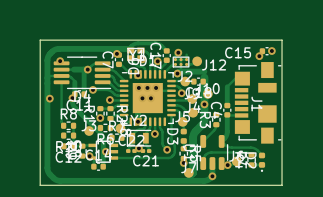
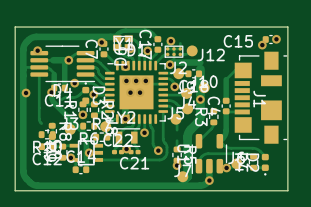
track: none -> (85, 90) (76, 96) (61, 99)
R8 rotation: 0° (68, 125) -> 90° clockwise (52, 131)
D3 rotation: 0° (183, 138) -> 180° (85, 93)
D3 position: (183, 138) -> (85, 93)

